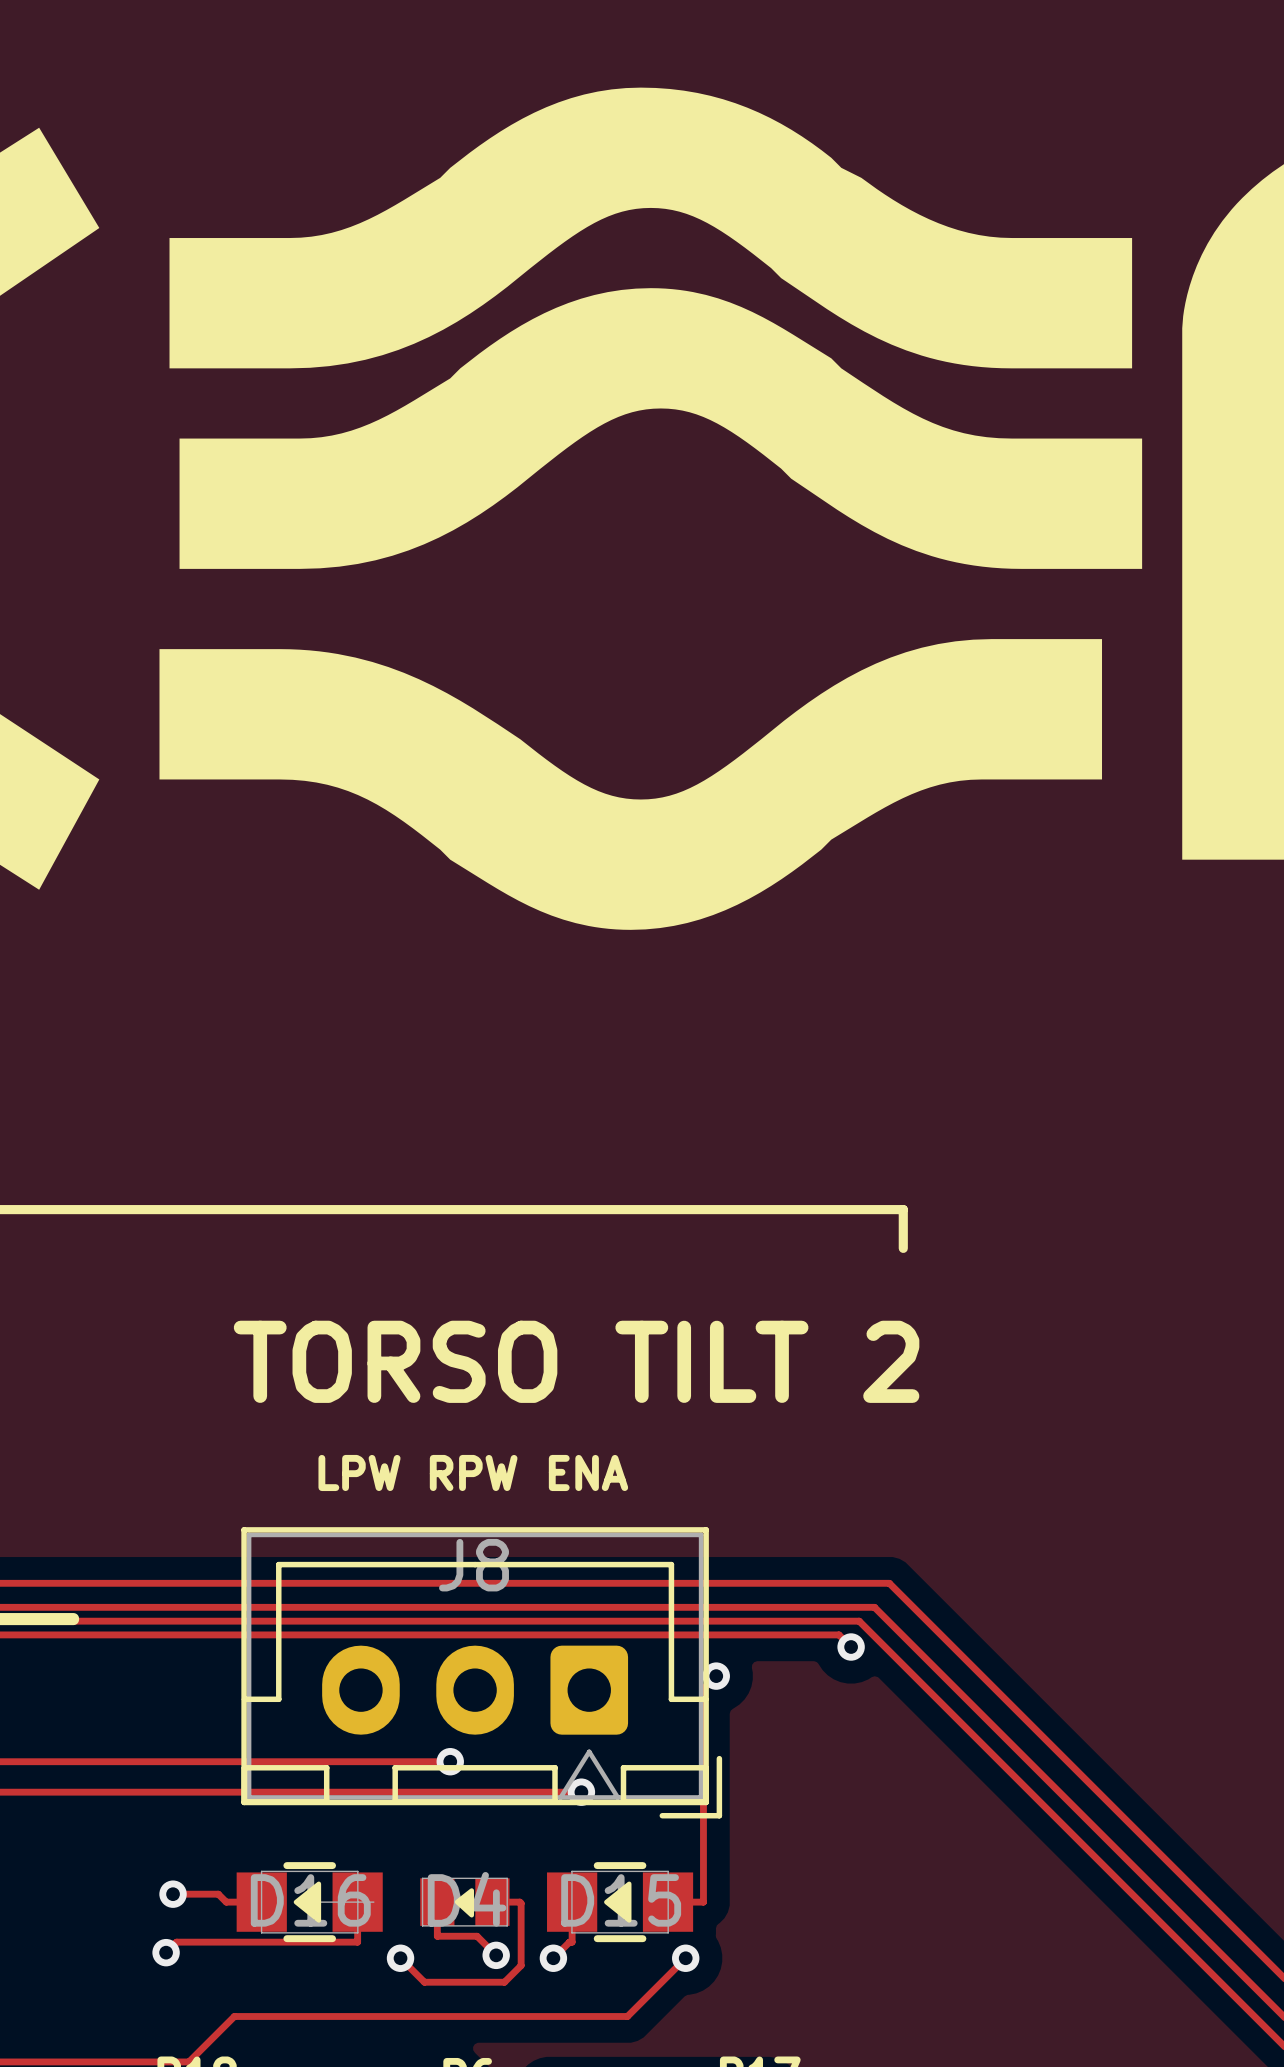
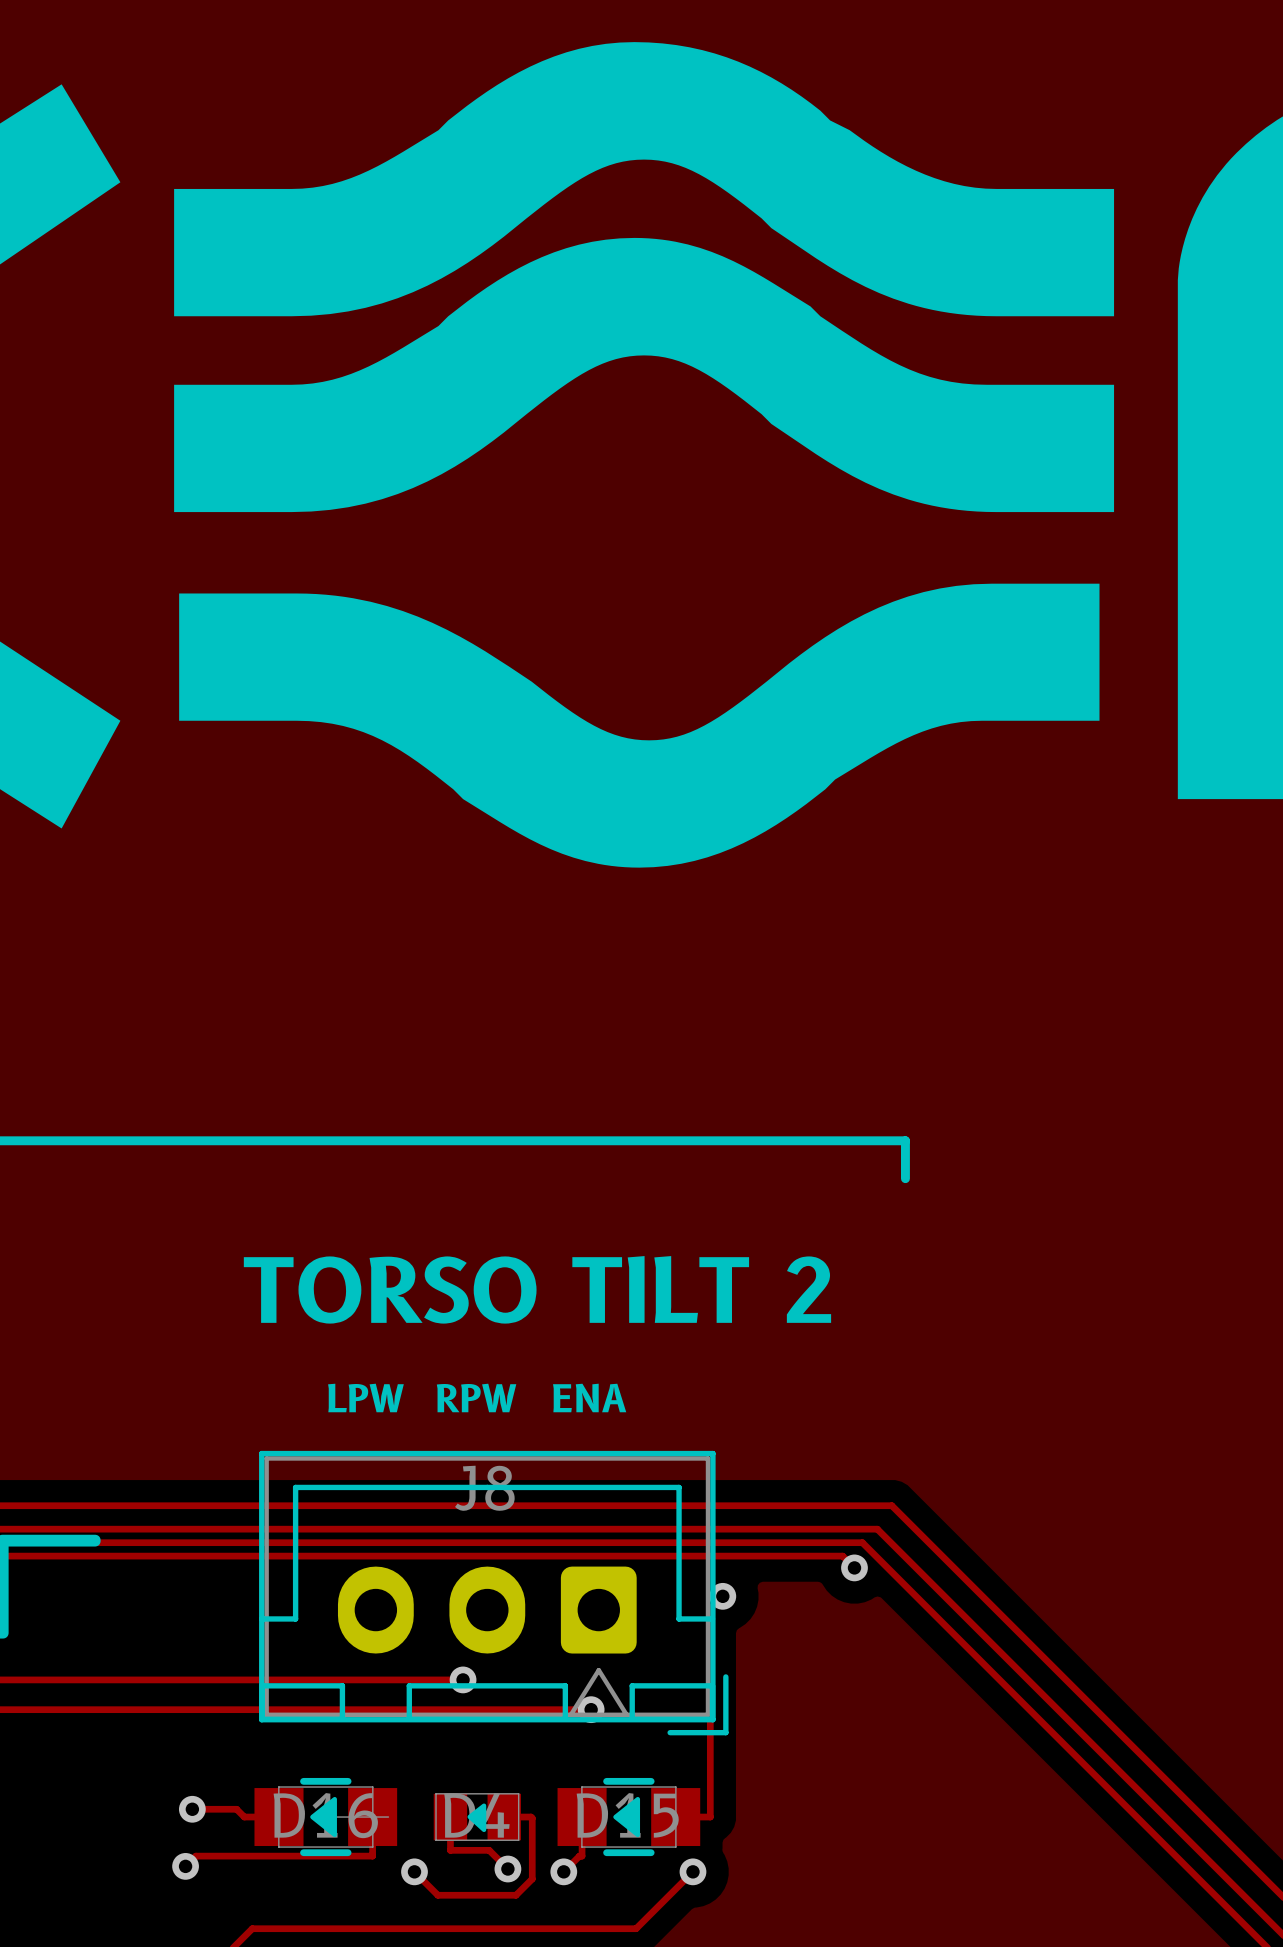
drawing position: (650, 227) -> (644, 179)
drawing position: (660, 428) -> (644, 374)

